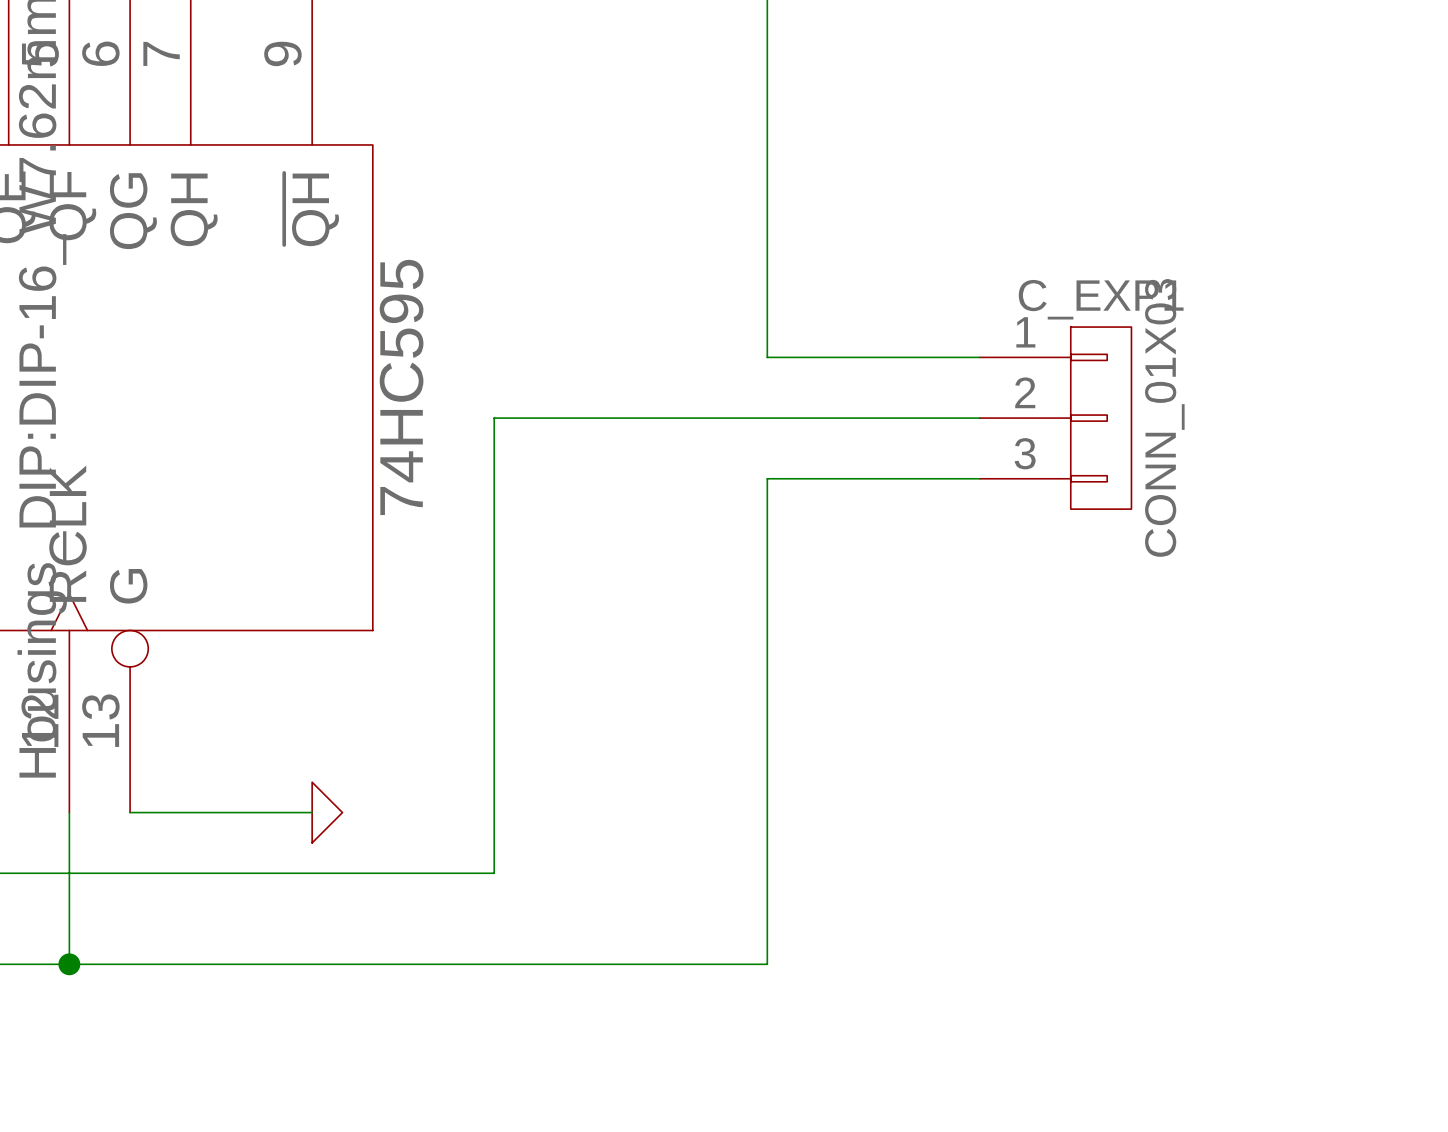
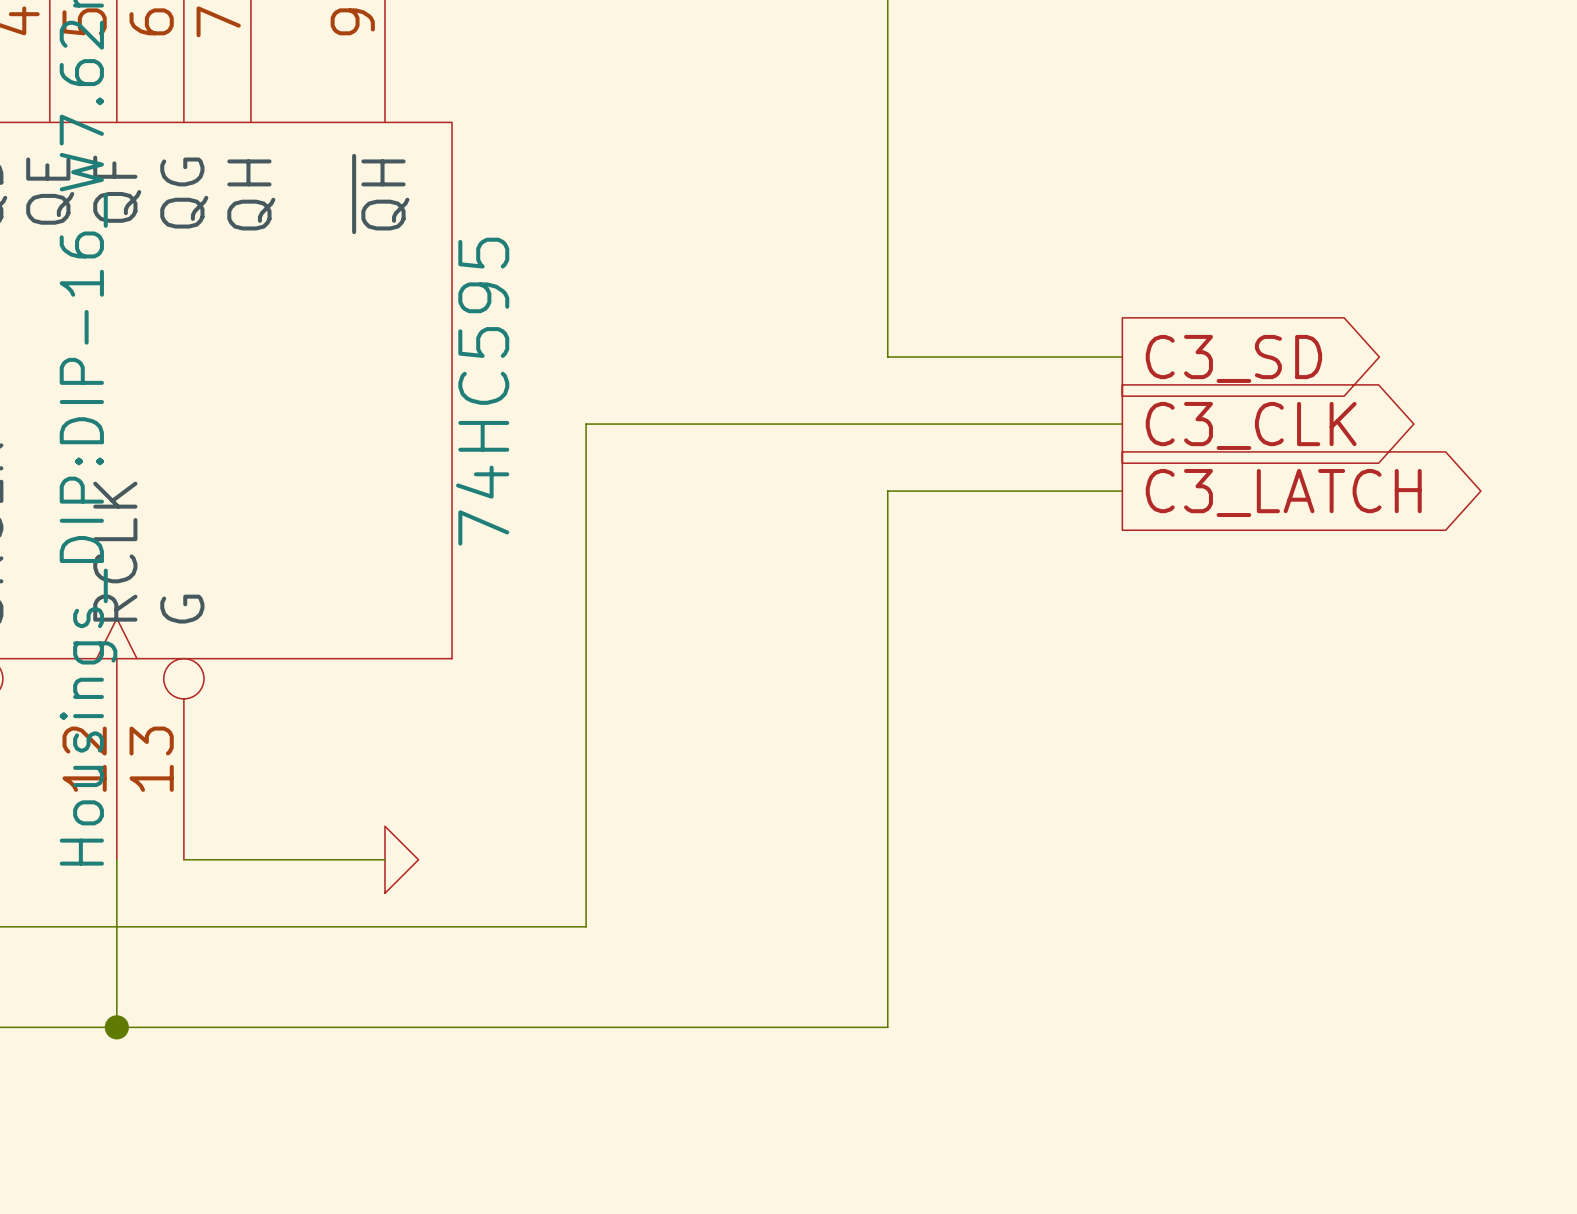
global label: none -> C3_SD (1233, 358)
C_EXP1: CONN_01X03 (1055, 418) -> none
global label: none -> C3_CLK (1251, 425)
global label: none -> C3_LATCH (1283, 493)

